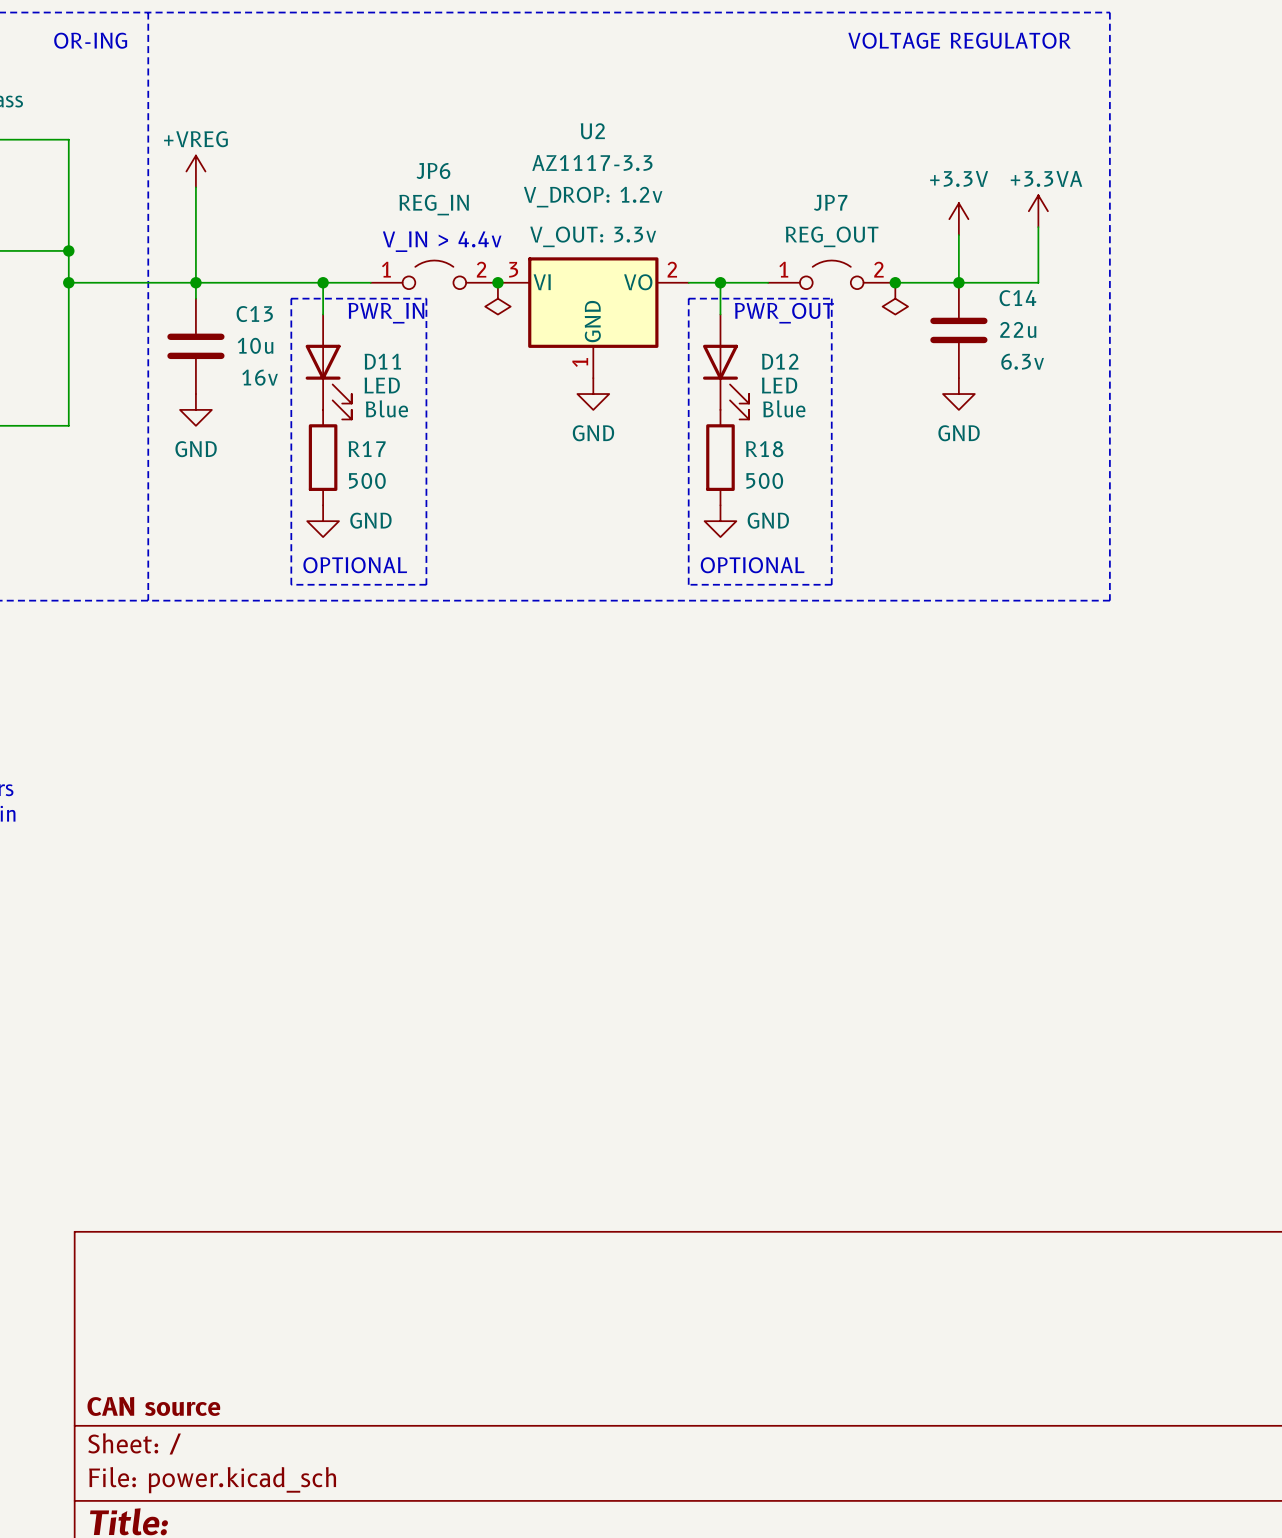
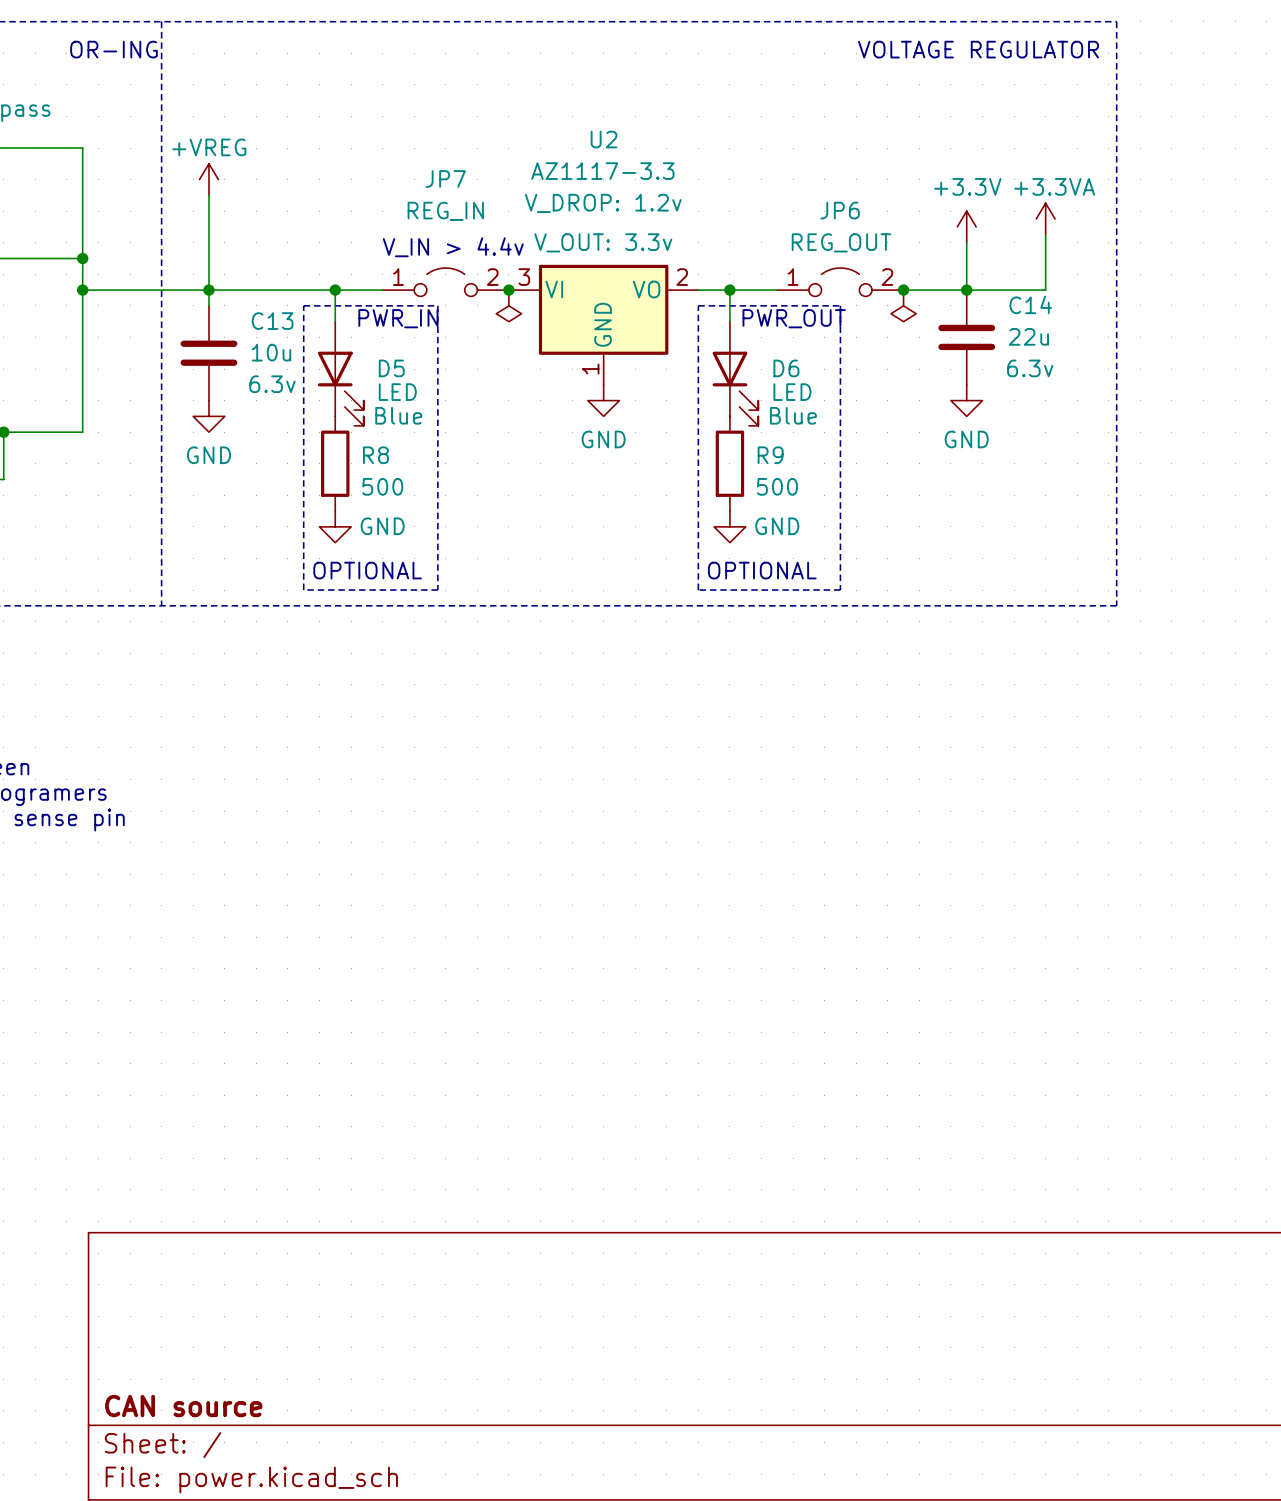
JP6 name: JP6 (433, 170) -> JP7 (445, 178)
JP7 name: JP7 (830, 202) -> JP6 (840, 210)
D11 name: D11 (382, 361) -> D5 (391, 368)
D12 name: D12 (780, 361) -> D6 (786, 368)
C13 text: 16v (260, 377) -> 6.3v (272, 384)
R17 name: R17 (367, 449) -> R8 (375, 455)
R18 name: R18 (764, 449) -> R9 (770, 455)

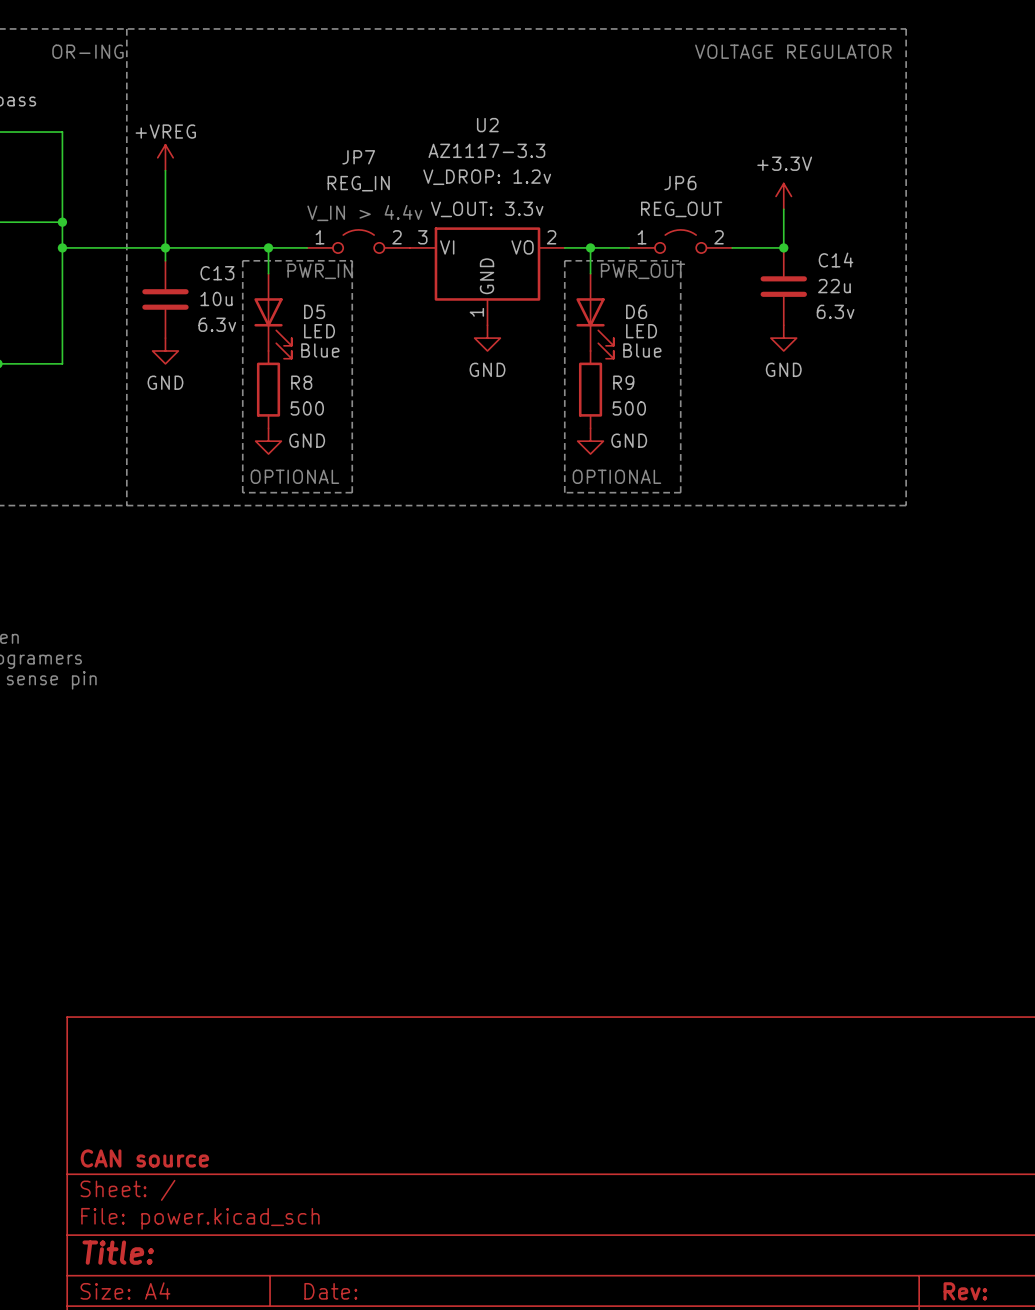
power symbol: +3.3VA (1045, 219) -> none
wire: (1045, 234) (1045, 290) (966, 290) -> none
junction: (508, 290) -> none
junction: (903, 290) -> none
power symbol: (508, 305) -> none
power symbol: (903, 305) -> none

